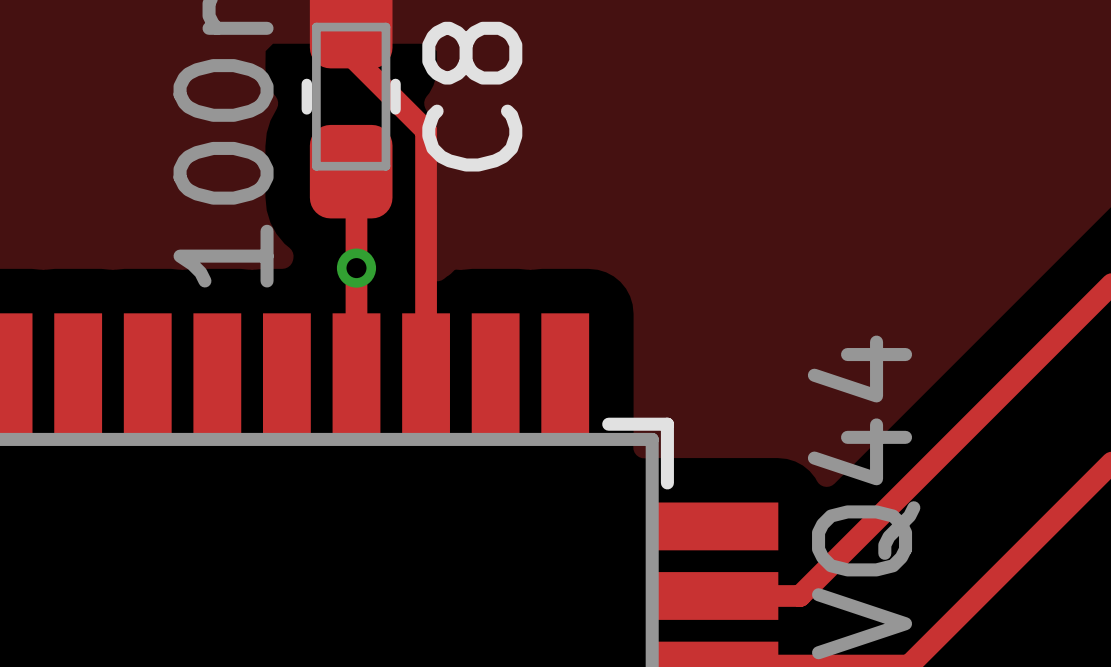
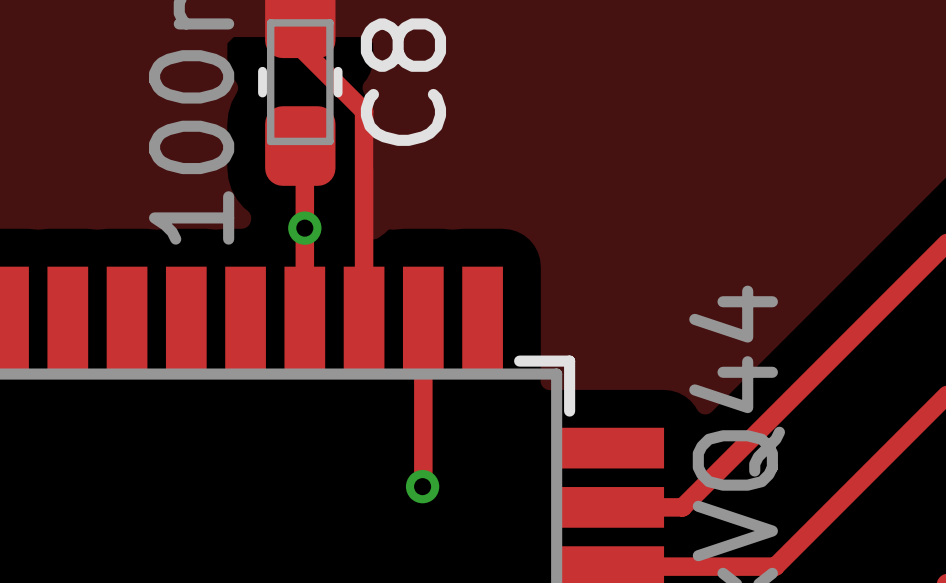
track: none -> (423, 322) (423, 485)
via: none -> (422, 486)

